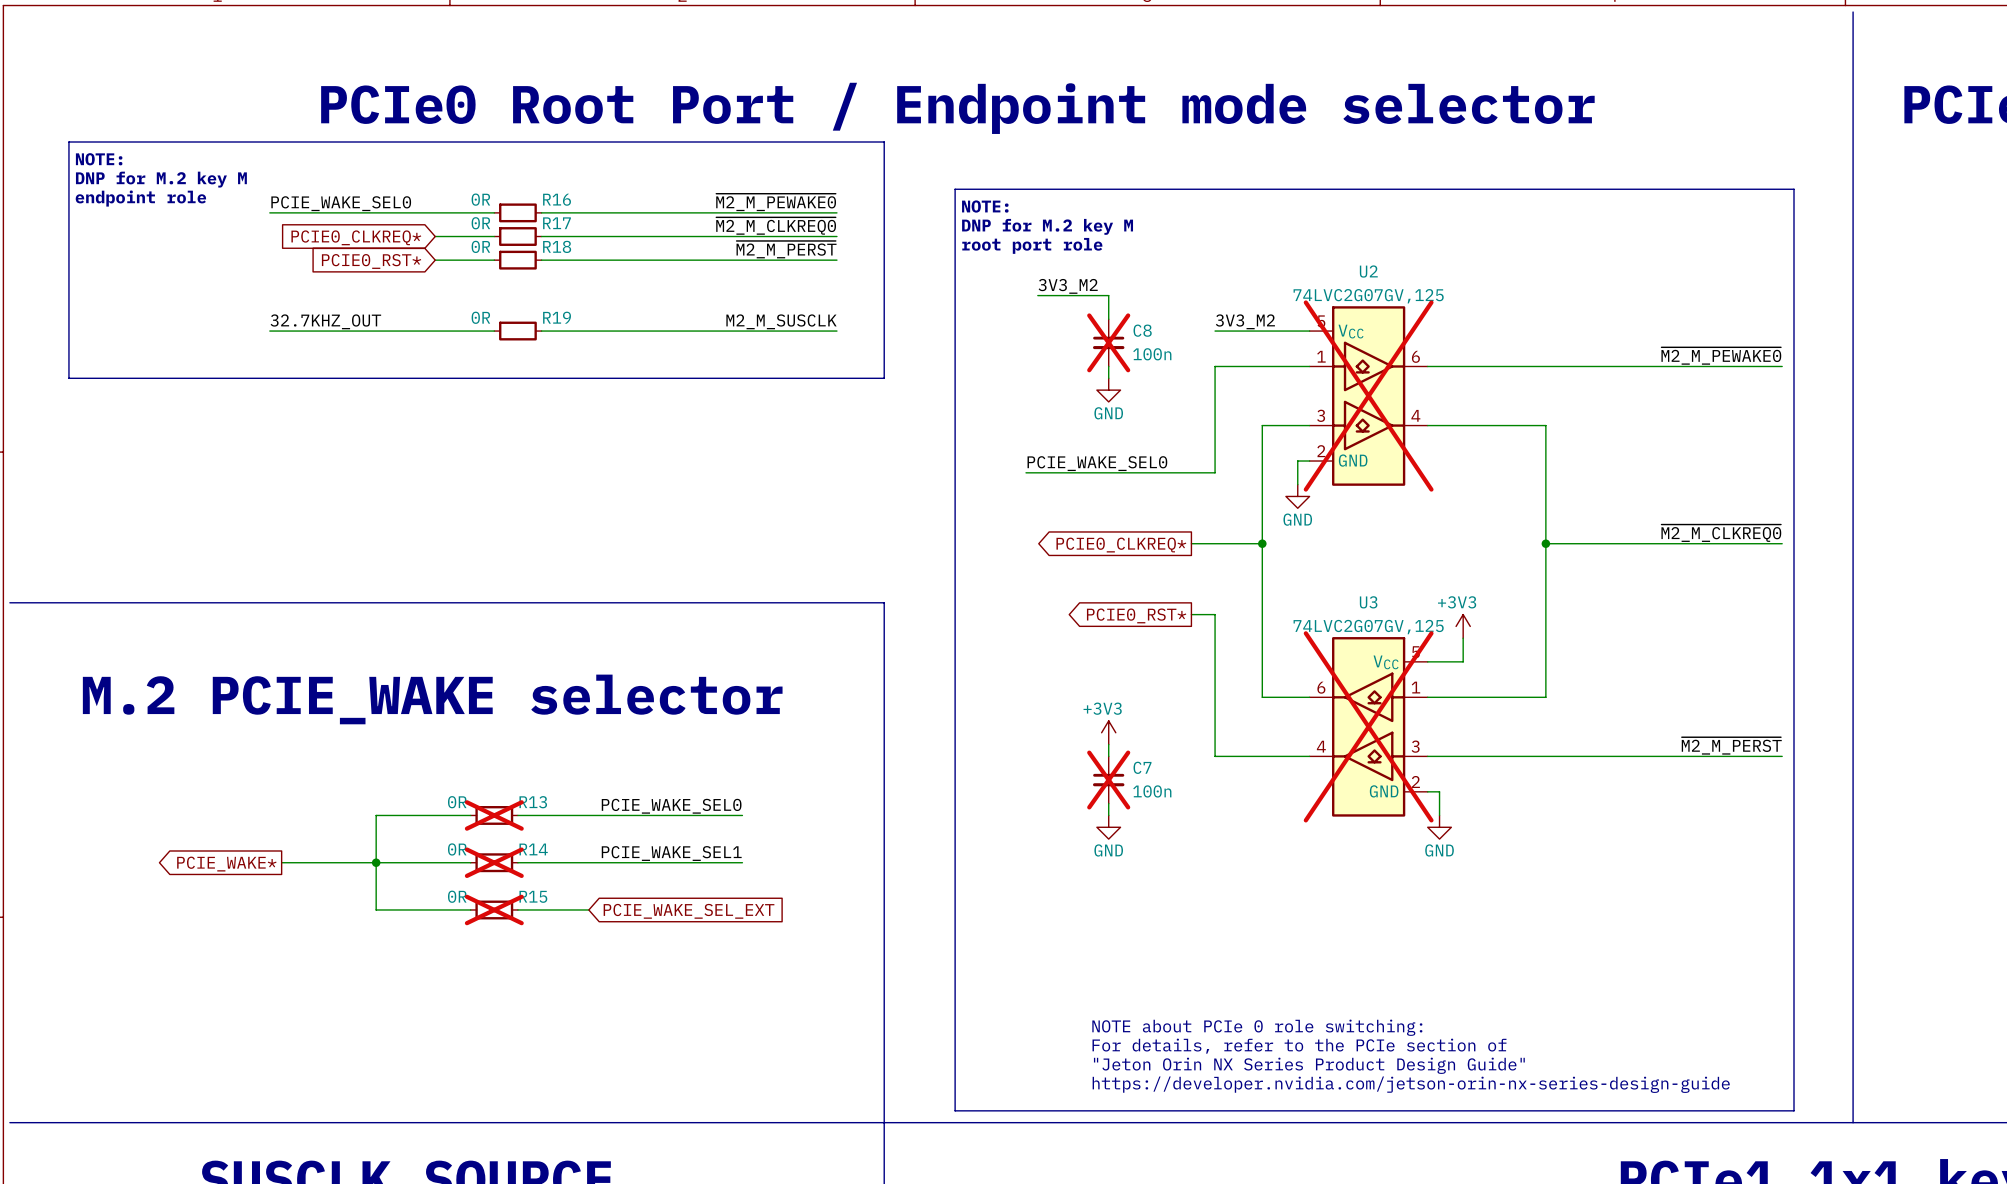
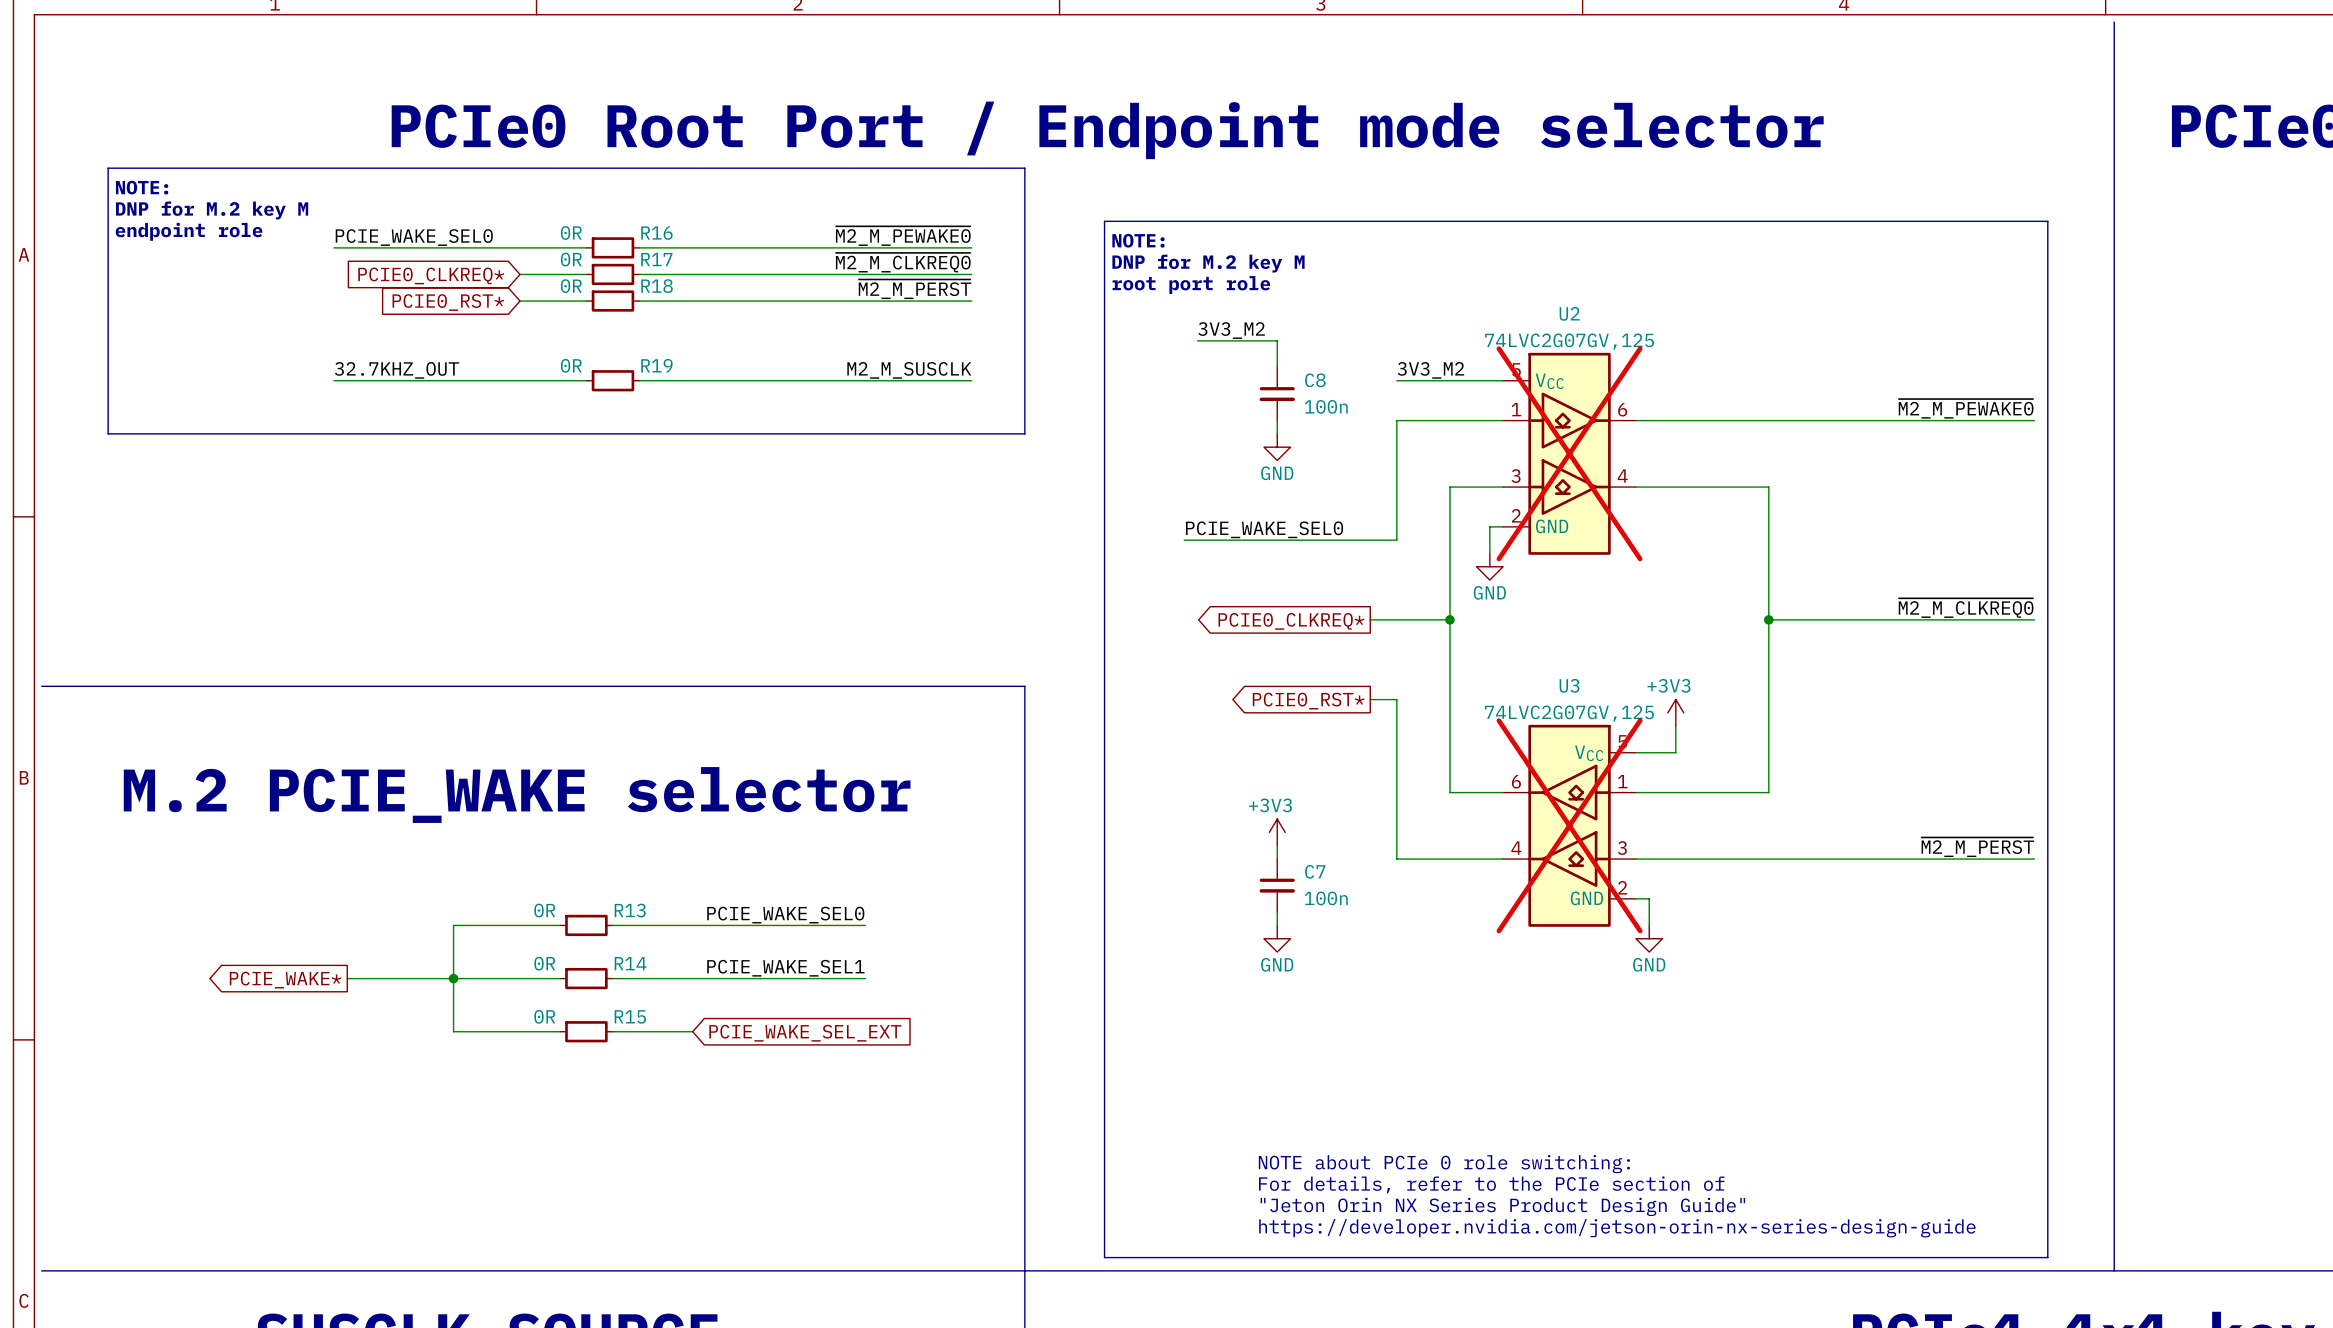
C8 do-not-place cross: (1108, 342) -> none
C7 do-not-place cross: (1108, 780) -> none
R13 do-not-place cross: (494, 815) -> none
R14 do-not-place cross: (494, 862) -> none
R15 do-not-place cross: (494, 909) -> none

